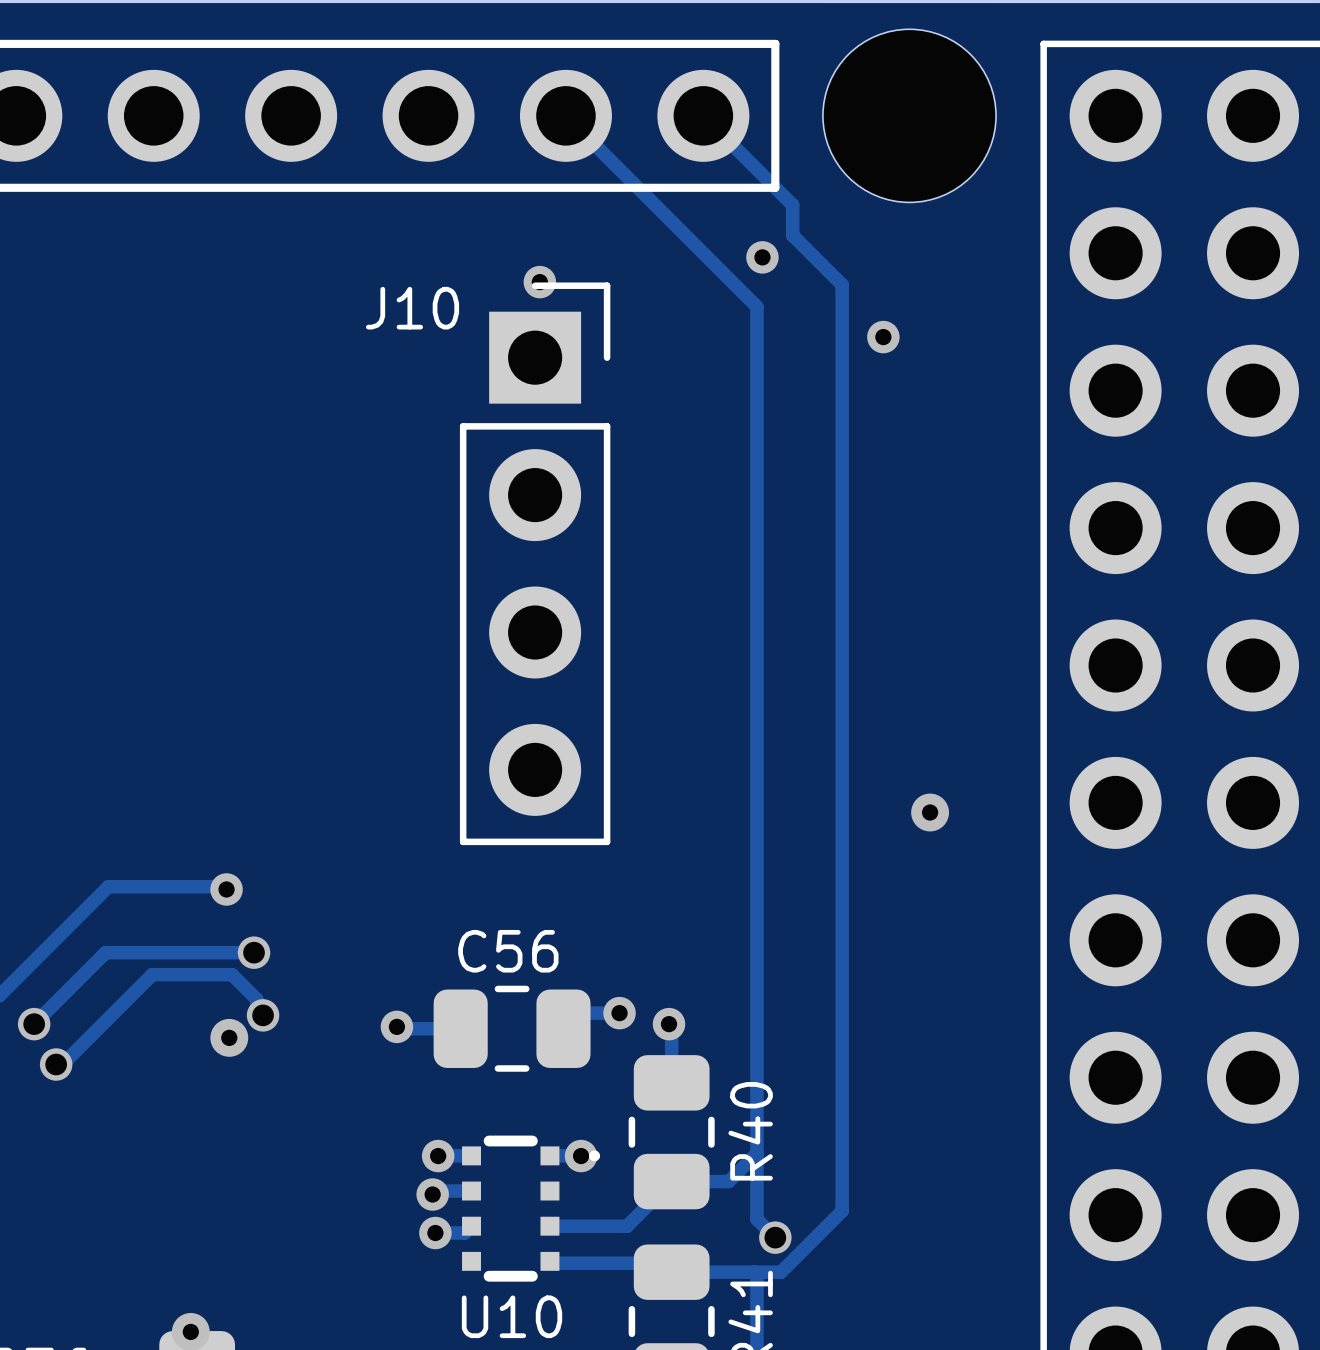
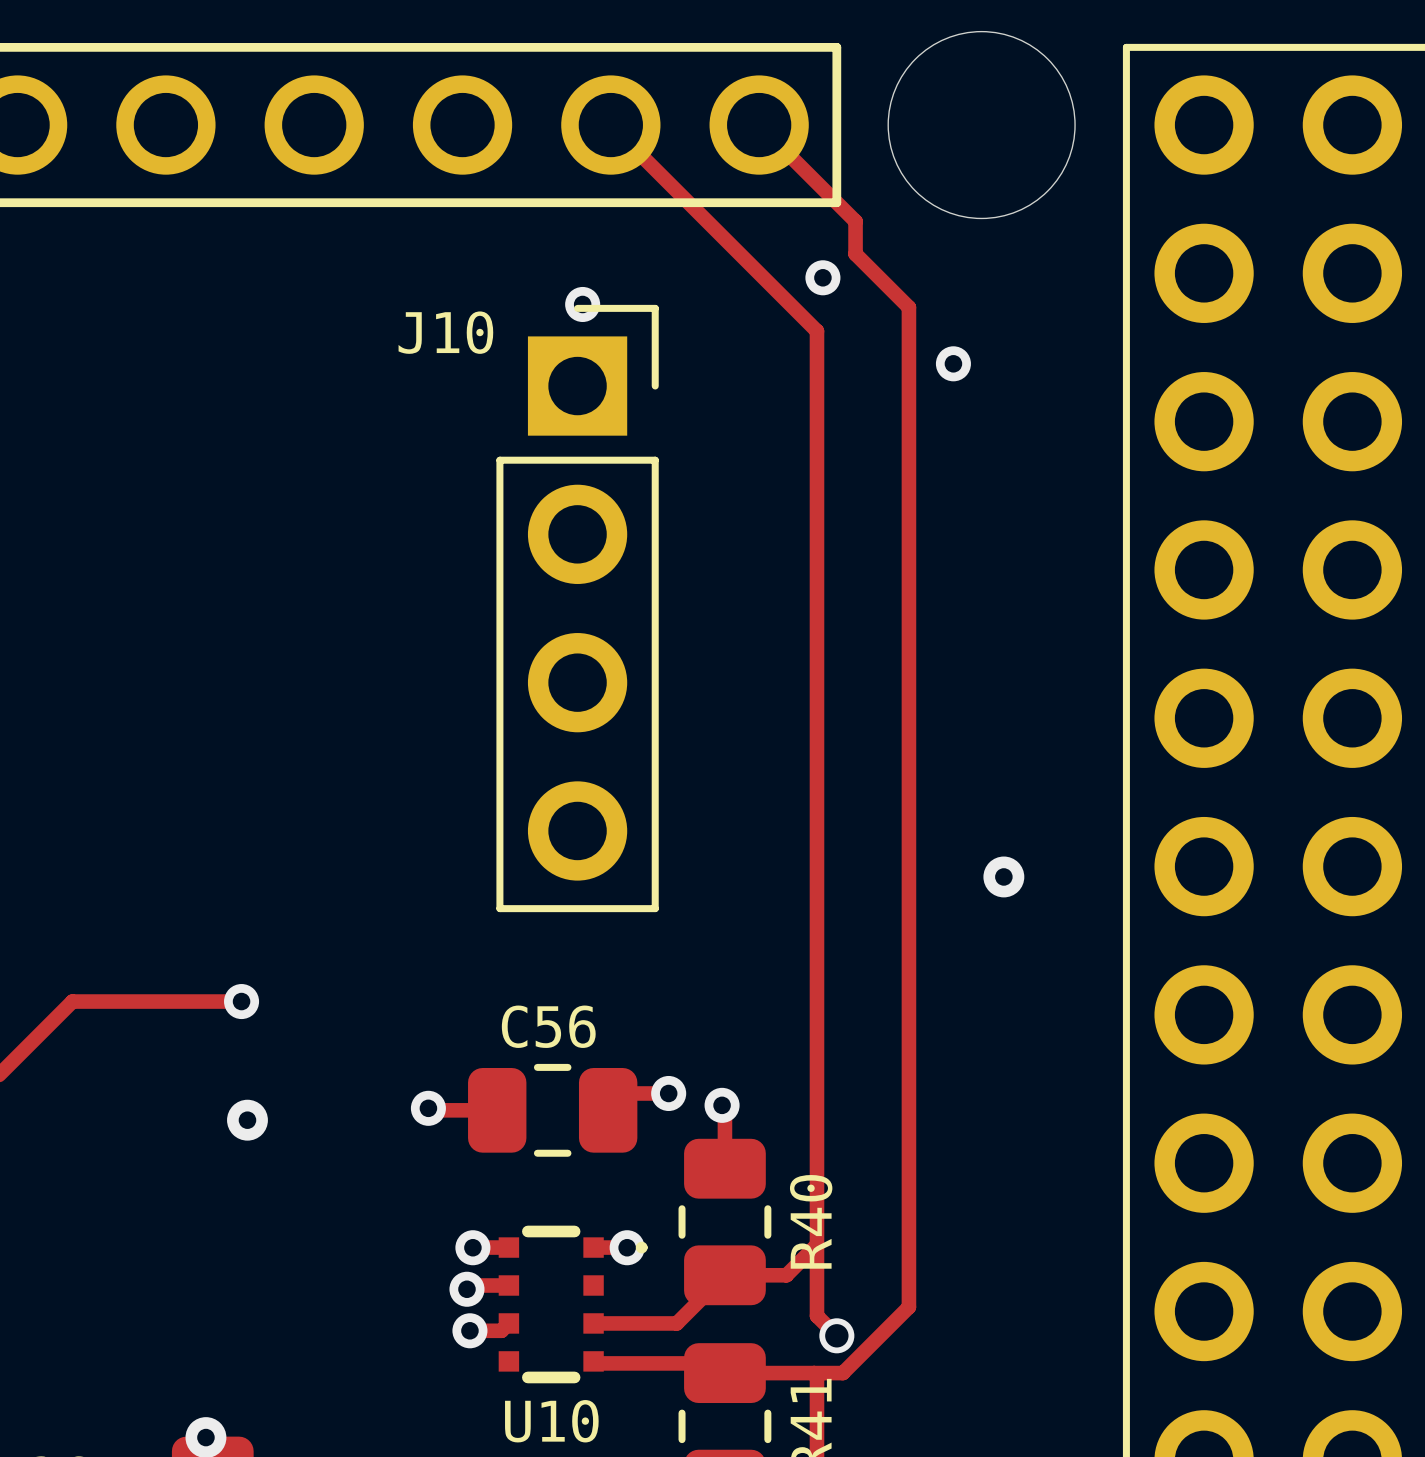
track: (226, 889) (223, 886) (108, 886) (67, 927) -> (241, 1001) (72, 1001)
via position: (226, 889) -> (241, 1001)
track: (254, 952) (105, 952) (34, 1024) -> none
via: (254, 952) -> none
track: (263, 1015) (256, 1012) (256, 999) (232, 974) (152, 974) (62, 1064) (56, 1064) -> none
via: (263, 1015) -> none
via: (34, 1024) -> none
via: (56, 1064) -> none

